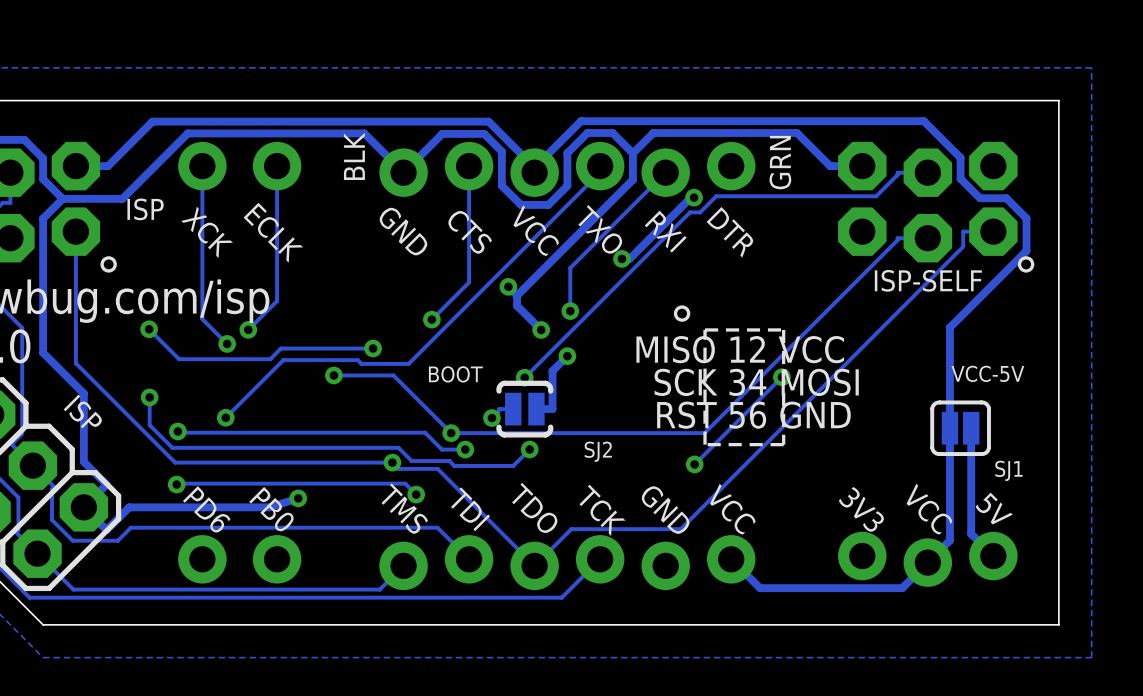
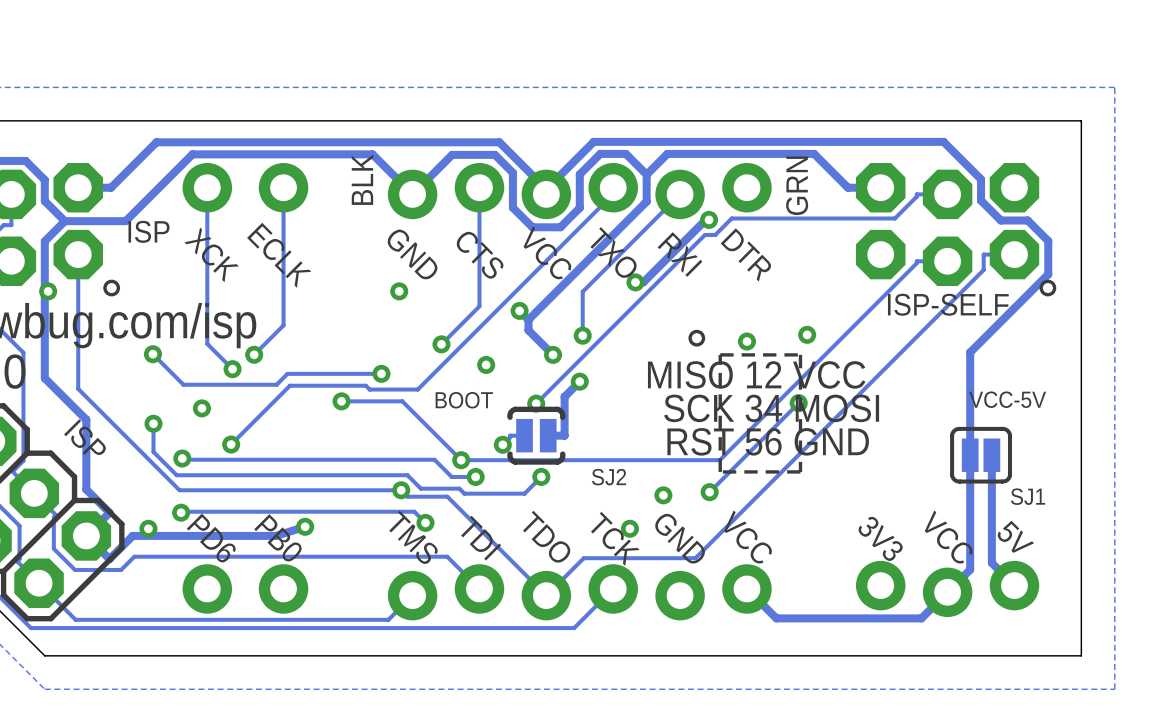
via: none -> (48, 291)
via: none -> (399, 291)
via: none -> (807, 334)
via: none -> (746, 341)
via: none -> (486, 364)
via: none -> (201, 408)
via: none -> (663, 495)
via: none -> (148, 528)
via: none -> (629, 528)

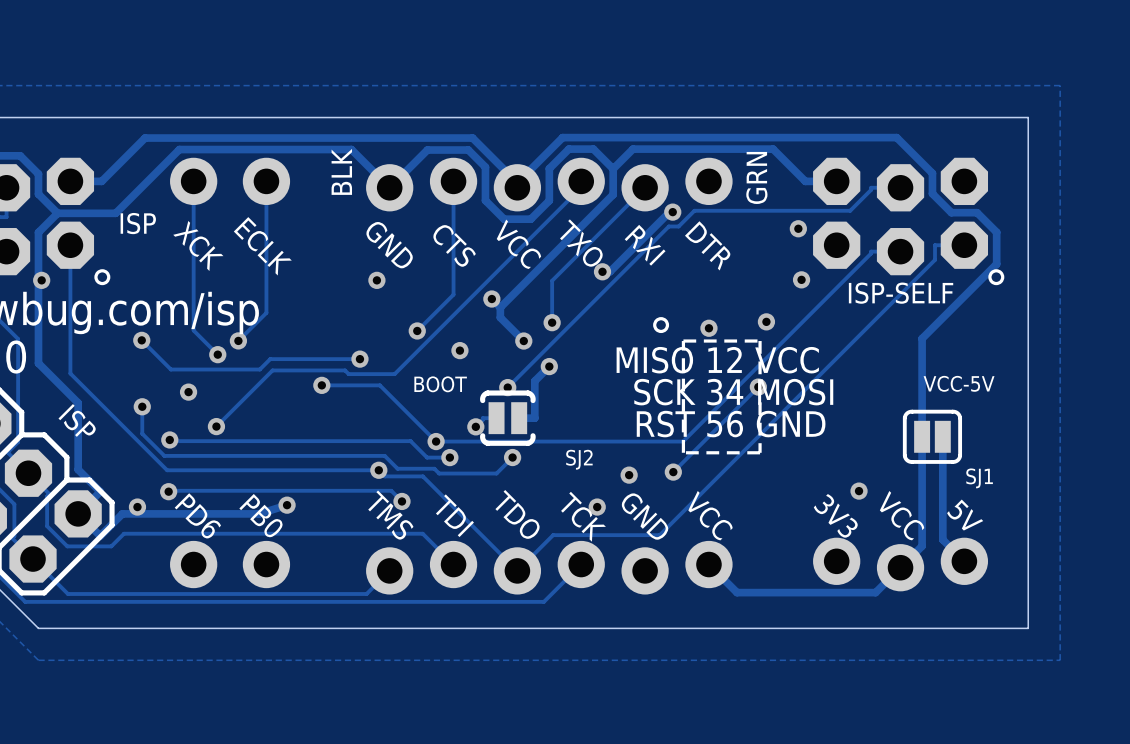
via: none -> (798, 228)
via: none -> (801, 279)
via: none -> (859, 491)

